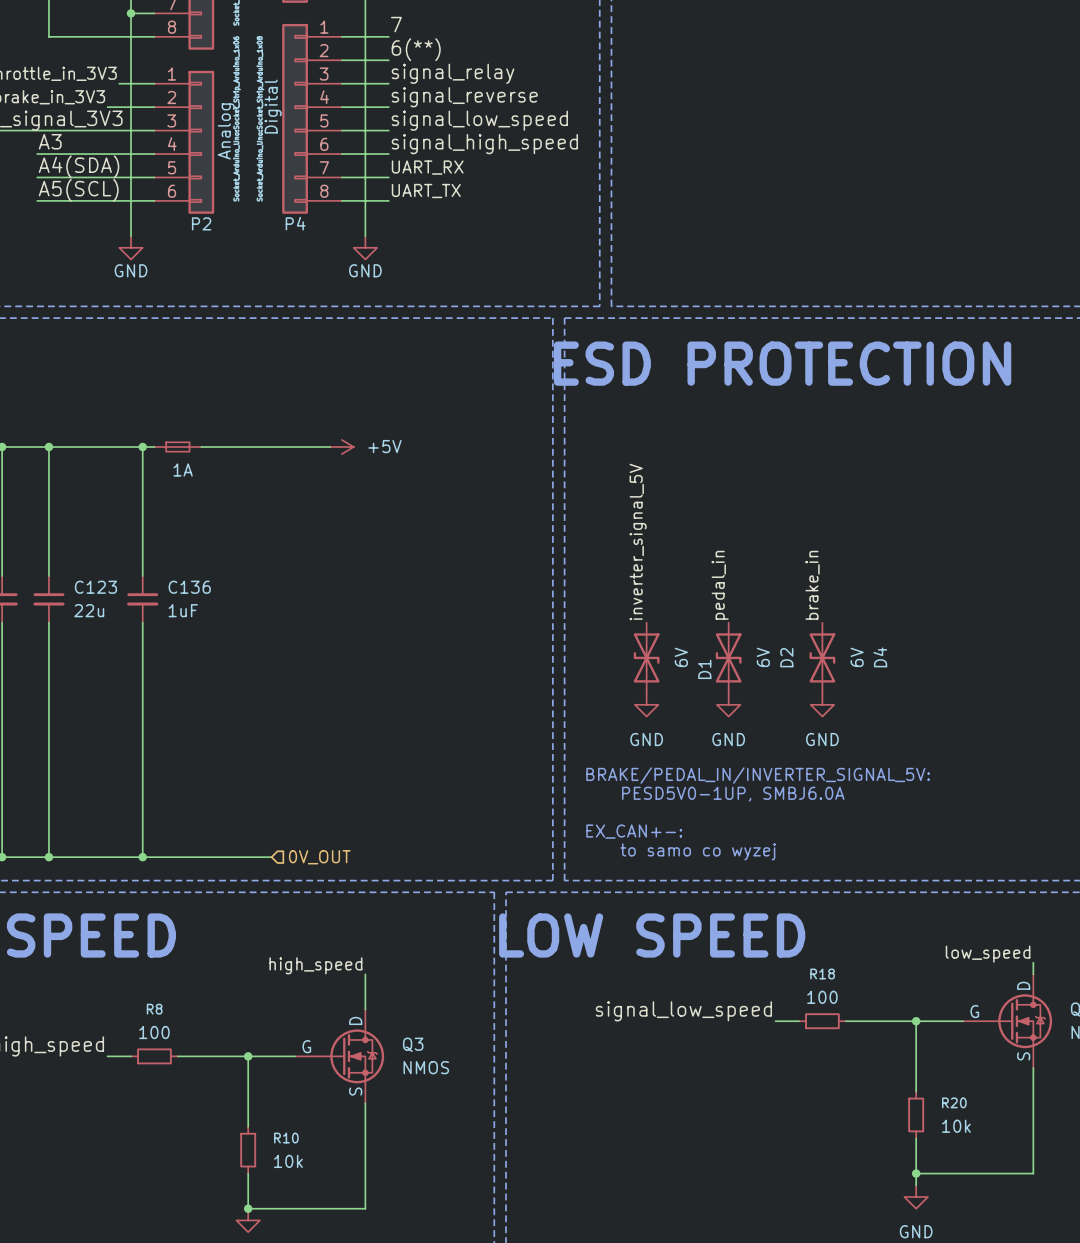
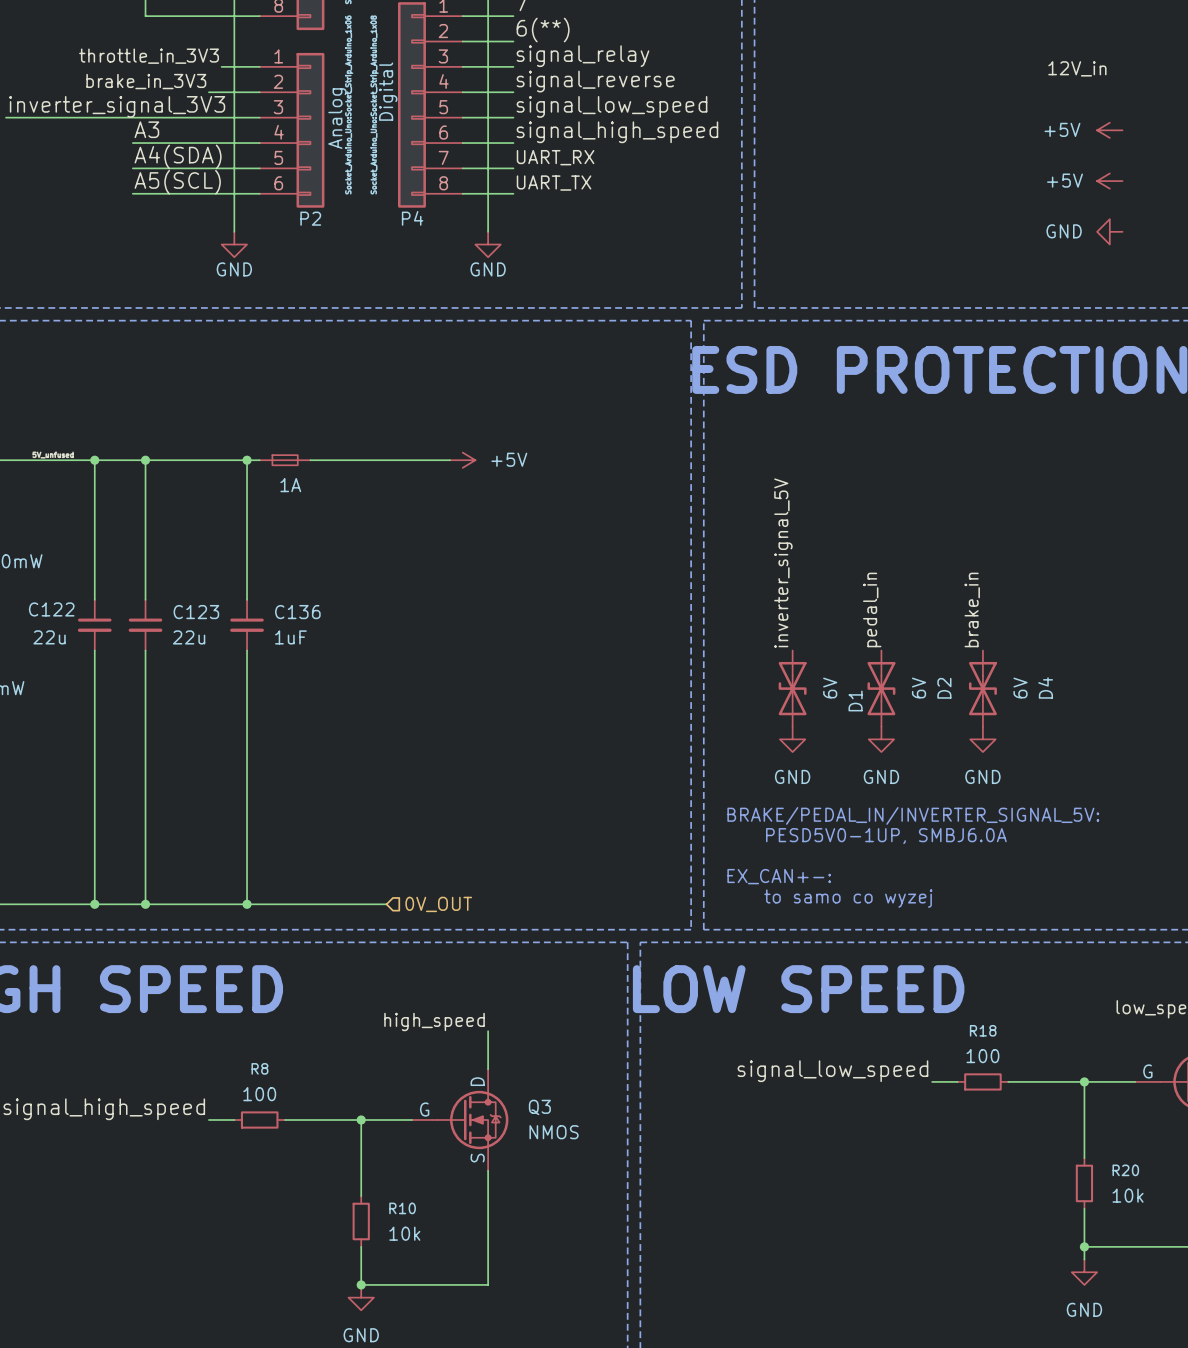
label: none -> 12V_in (1077, 68)
power symbol: none -> +5V (1109, 130)
power symbol: none -> +5V (1109, 181)
power symbol: none -> GND (1109, 231)

